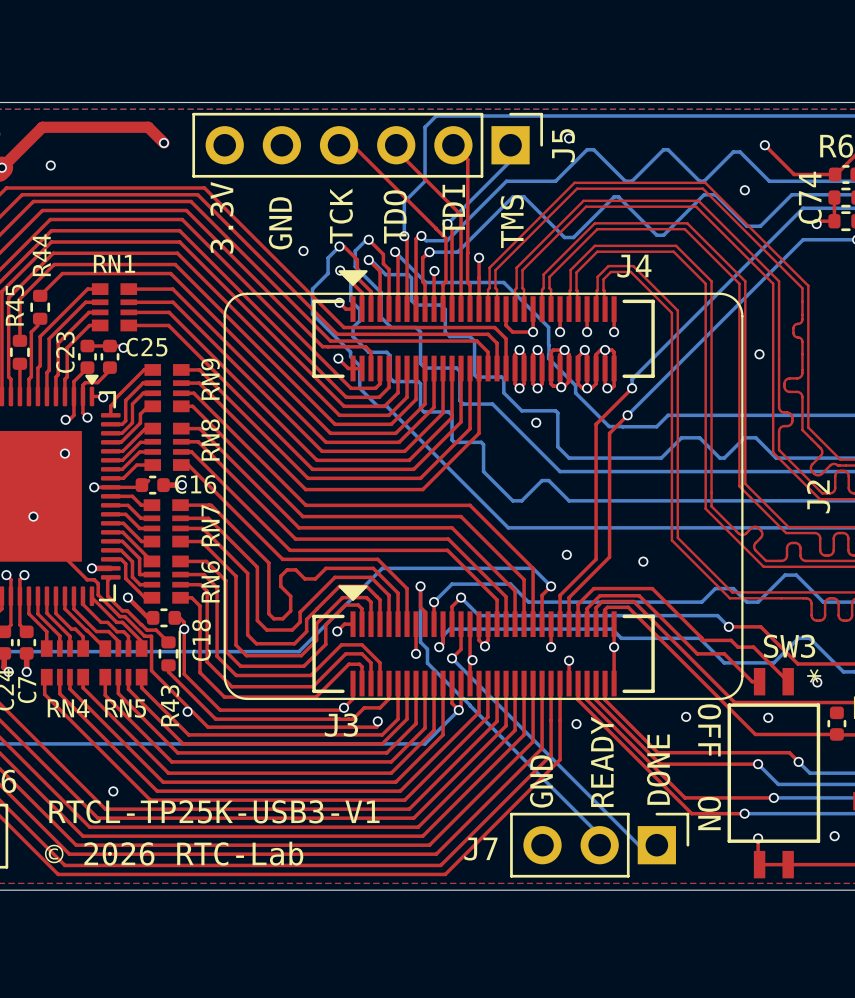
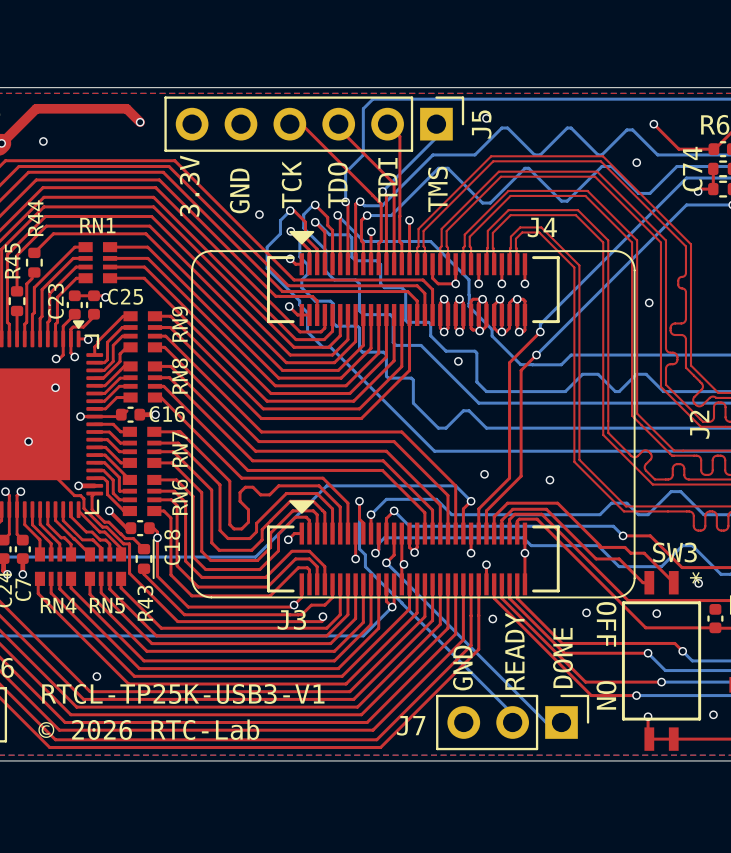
via: (187, 711) -> none

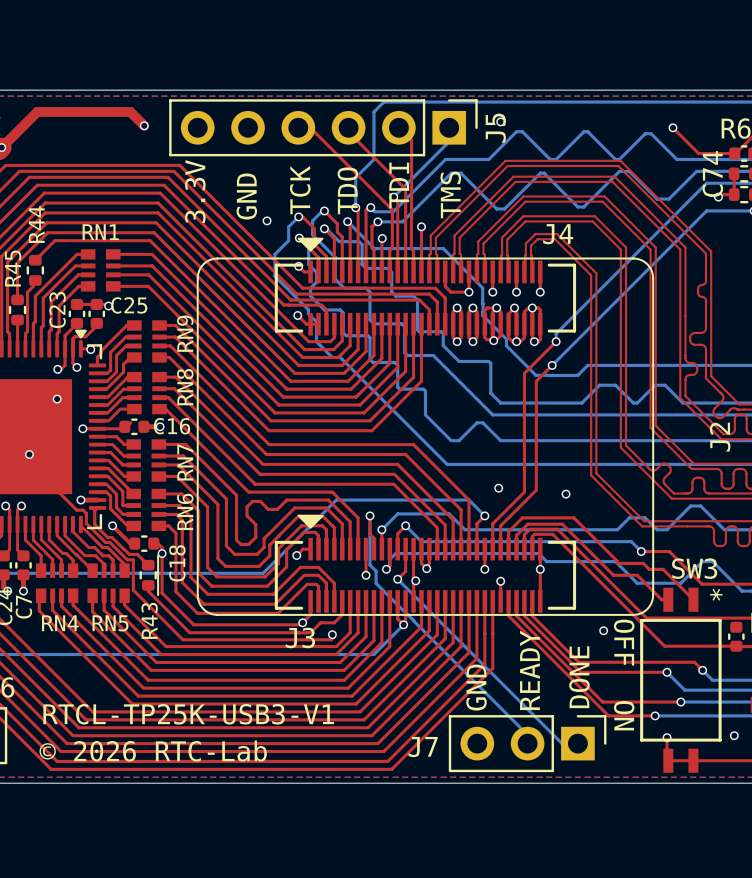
via: (43, 141) -> none
via: (636, 162) -> none
via: (649, 302) -> none
via: (458, 361) -> none
via: (698, 583) -> none
via: (656, 613) -> none
via: (492, 618) -> none
via: (96, 676) -> none

